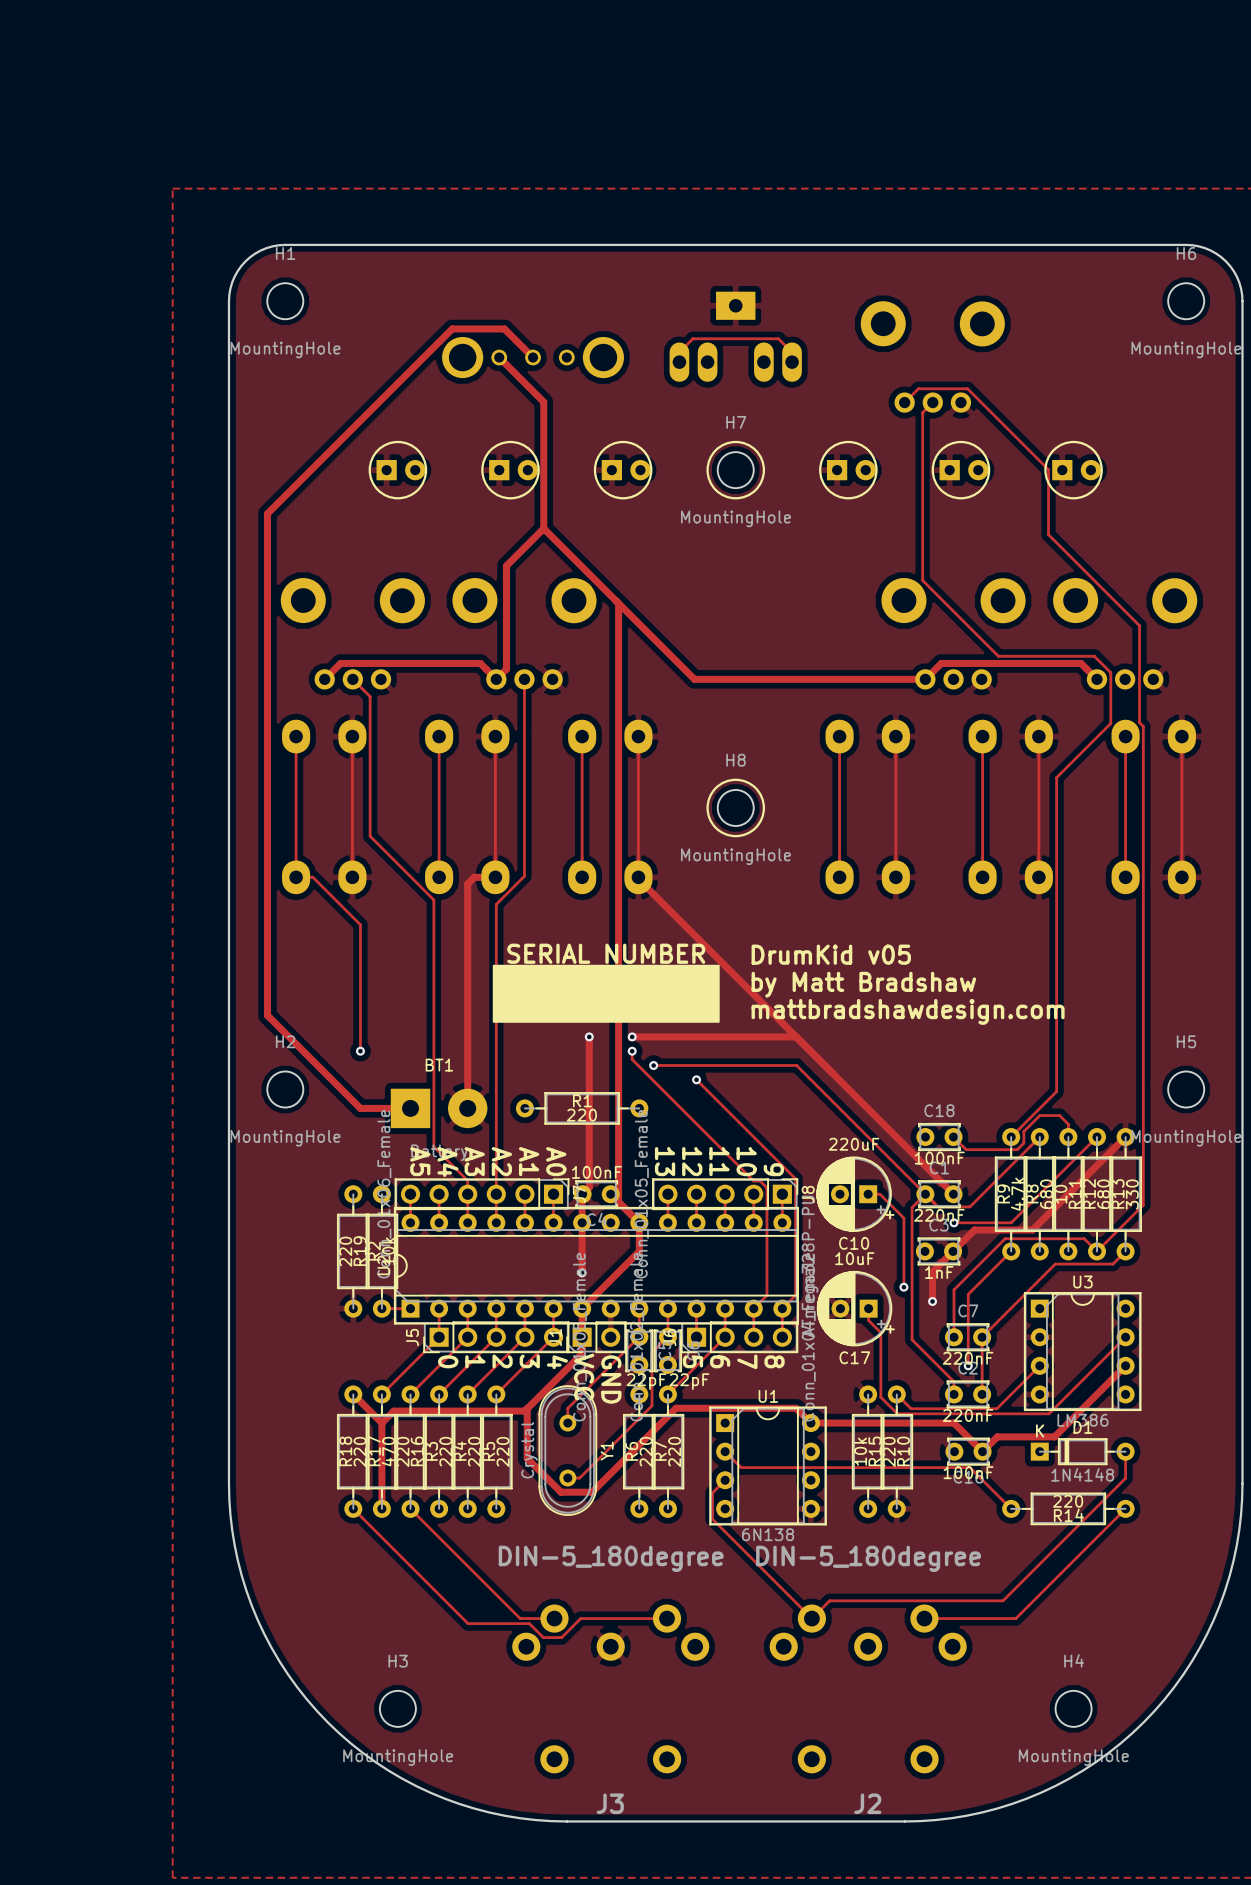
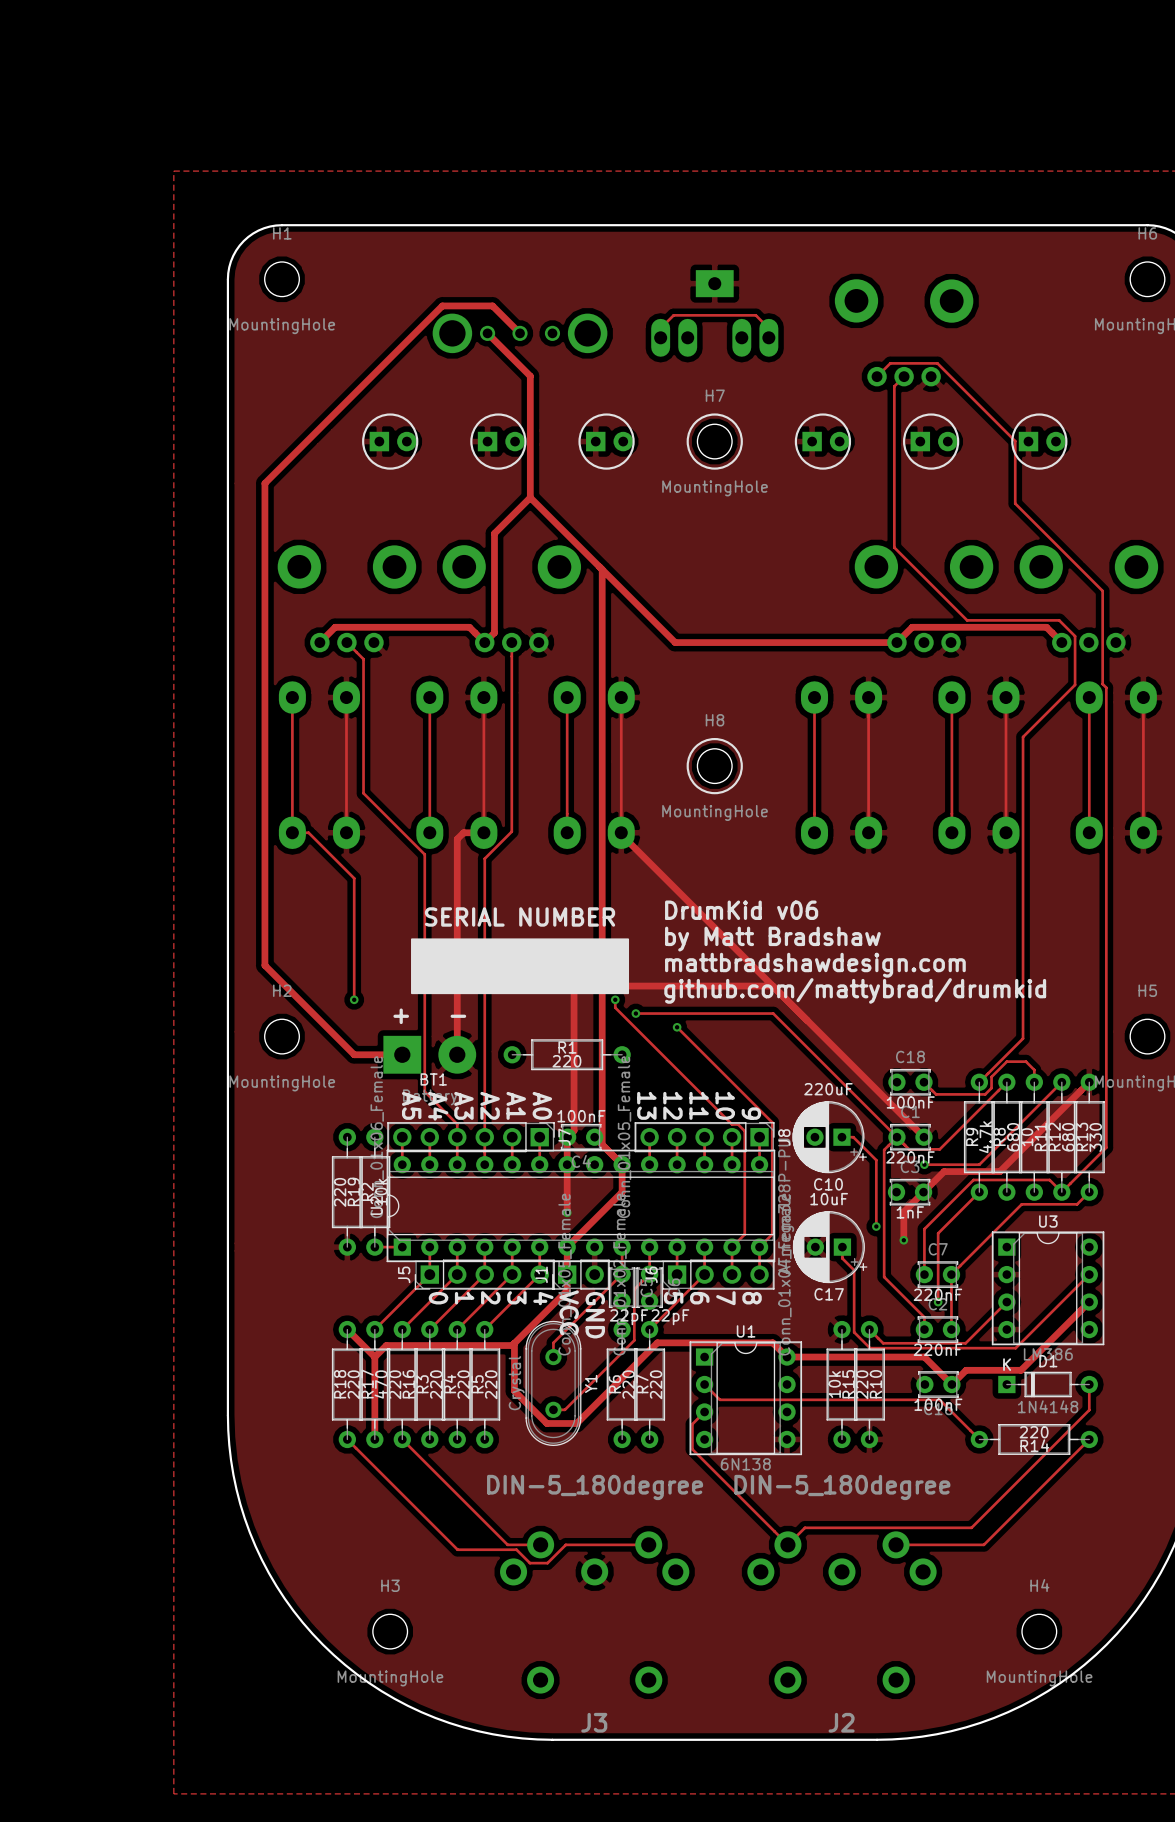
text position: SERIAL NUMBER (606, 953) -> SERIAL NUMBER (520, 916)
text: DrumKid v05 (831, 954) -> DrumKid v06 (741, 910)
text position: by Matt Bradshaw (863, 984) -> by Matt Bradshaw (772, 939)
drawing position: (606, 993) -> (520, 966)
text position: mattbradshawdesign.com (908, 1011) -> mattbradshawdesign.com (815, 965)
text: none -> github.com/mattybrad/drumkid (855, 990)
BT1 name position: BT1 (439, 1065) -> BT1 (433, 1079)
text: none -> + - (429, 1016)

